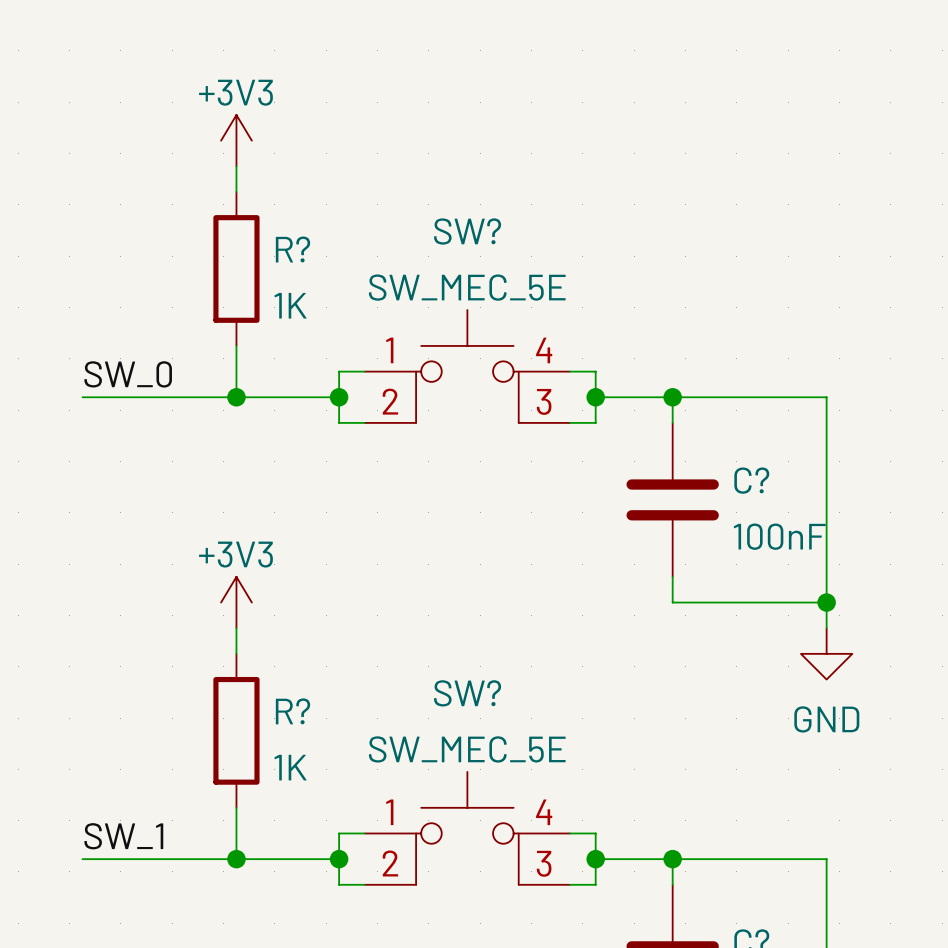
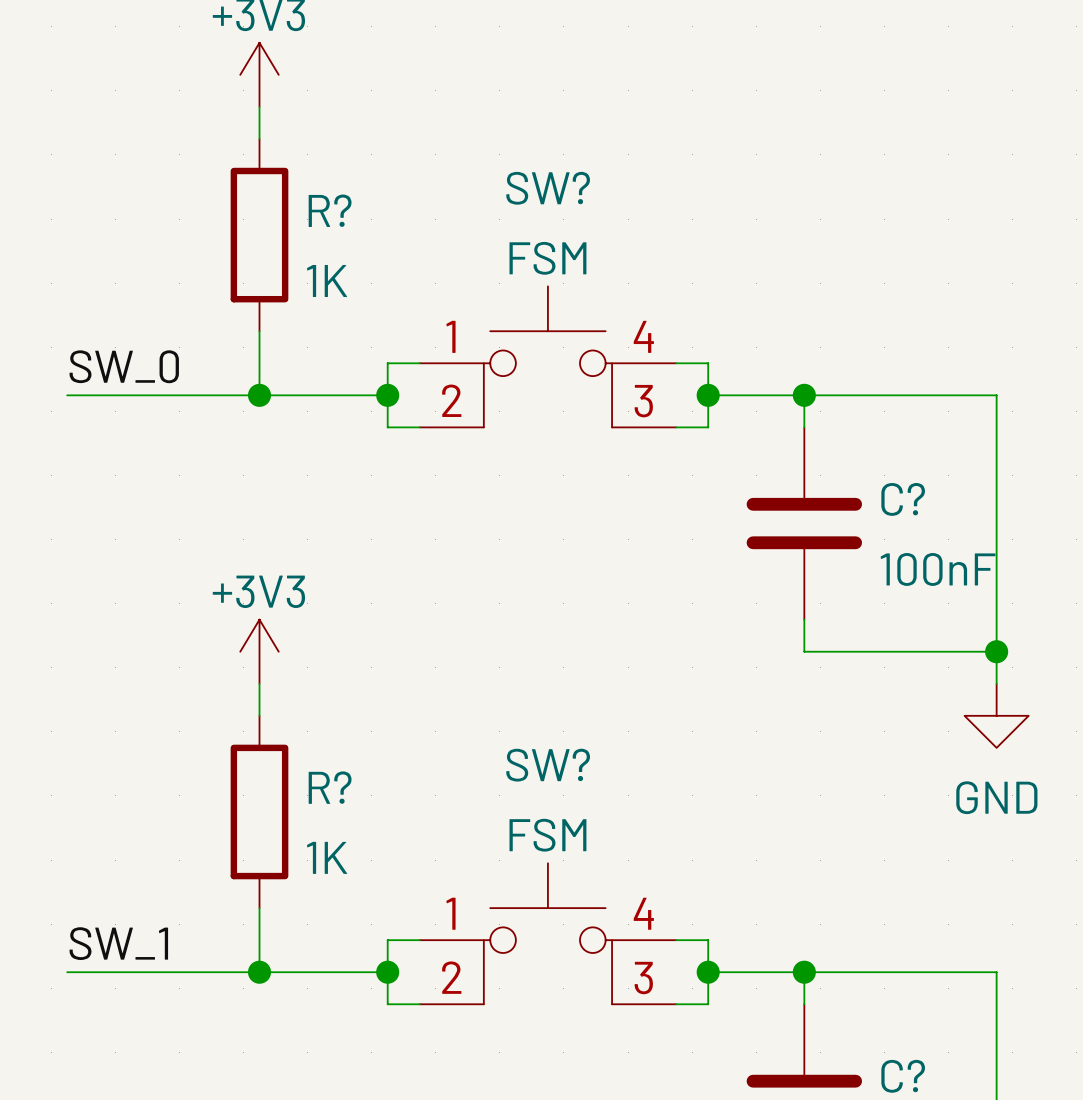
SW? value: SW_MEC_5E (467, 287) -> FSM (547, 258)
SW? value: SW_MEC_5E (467, 749) -> FSM (547, 835)

